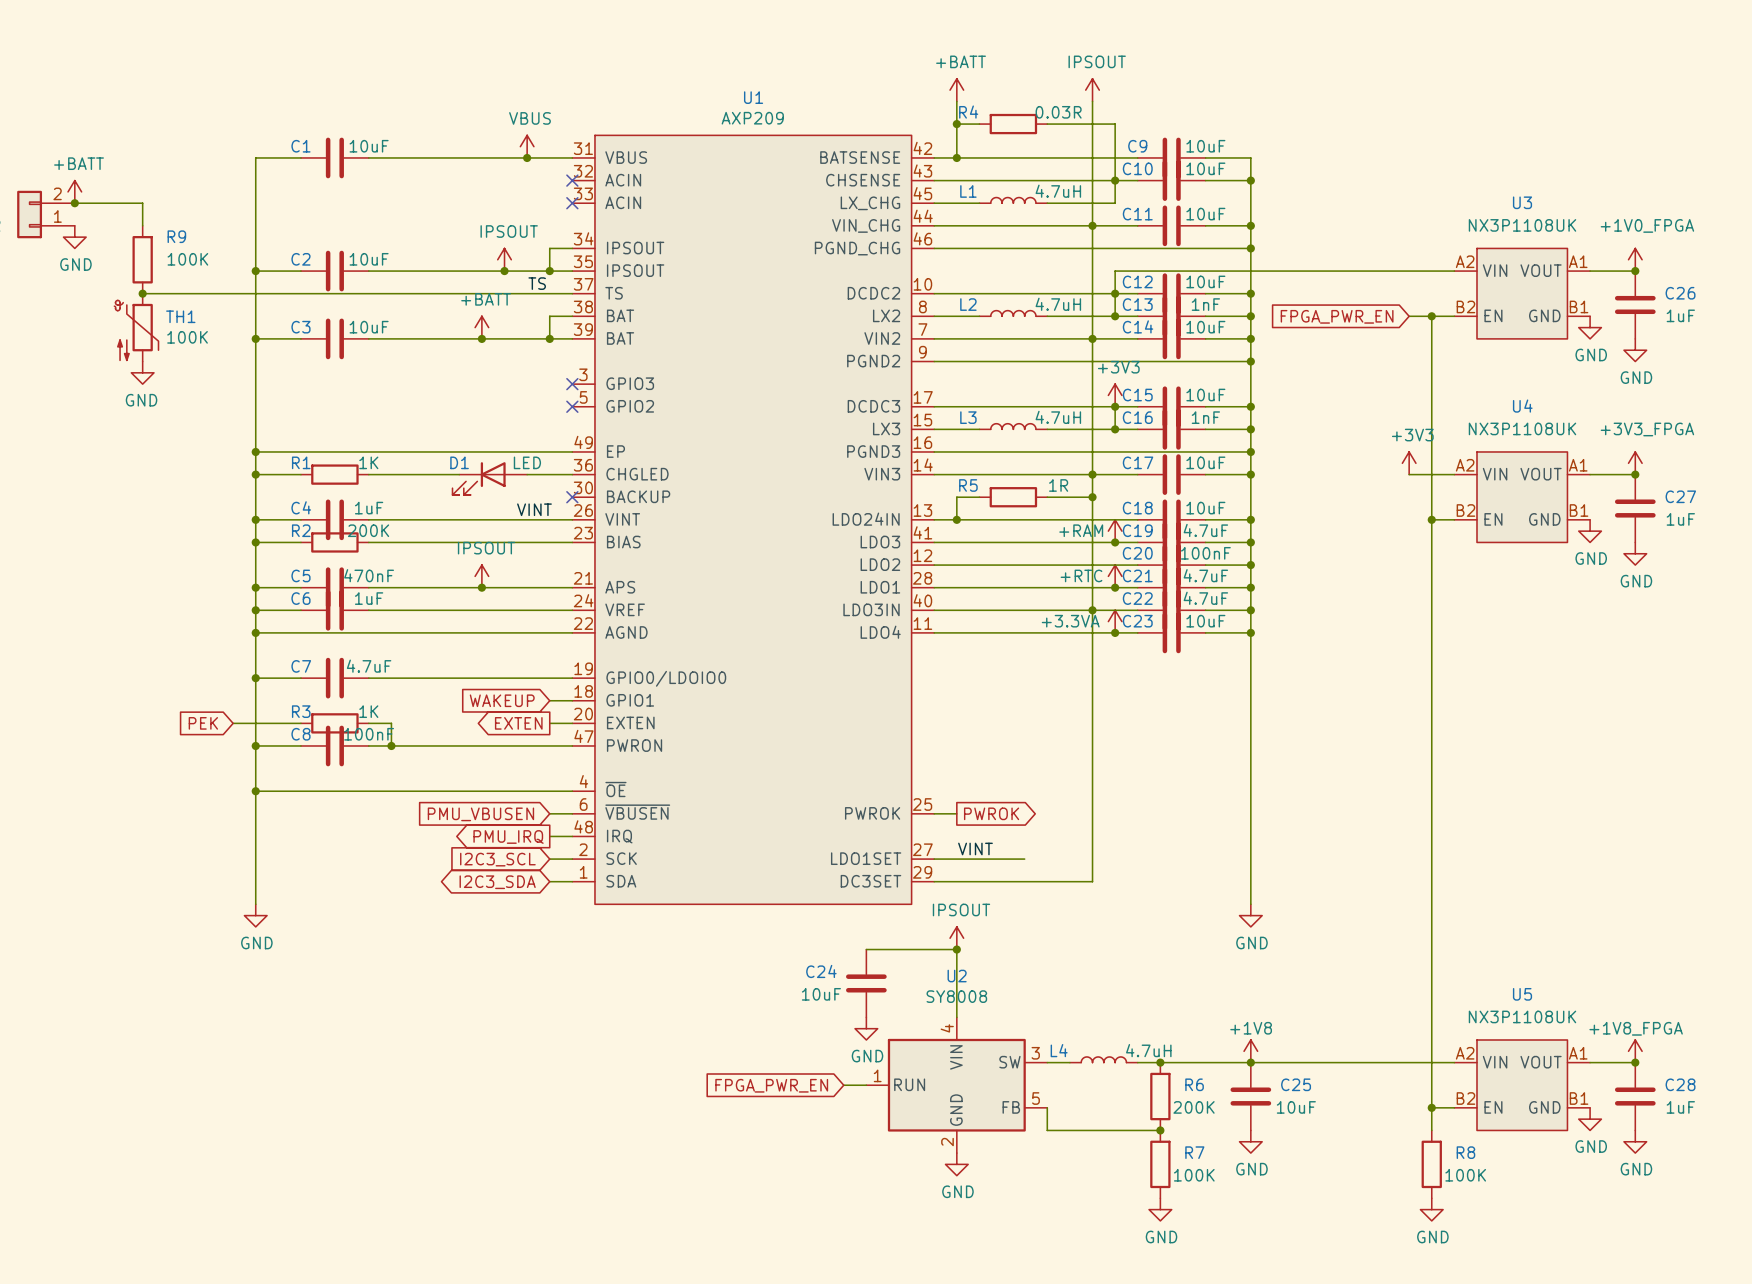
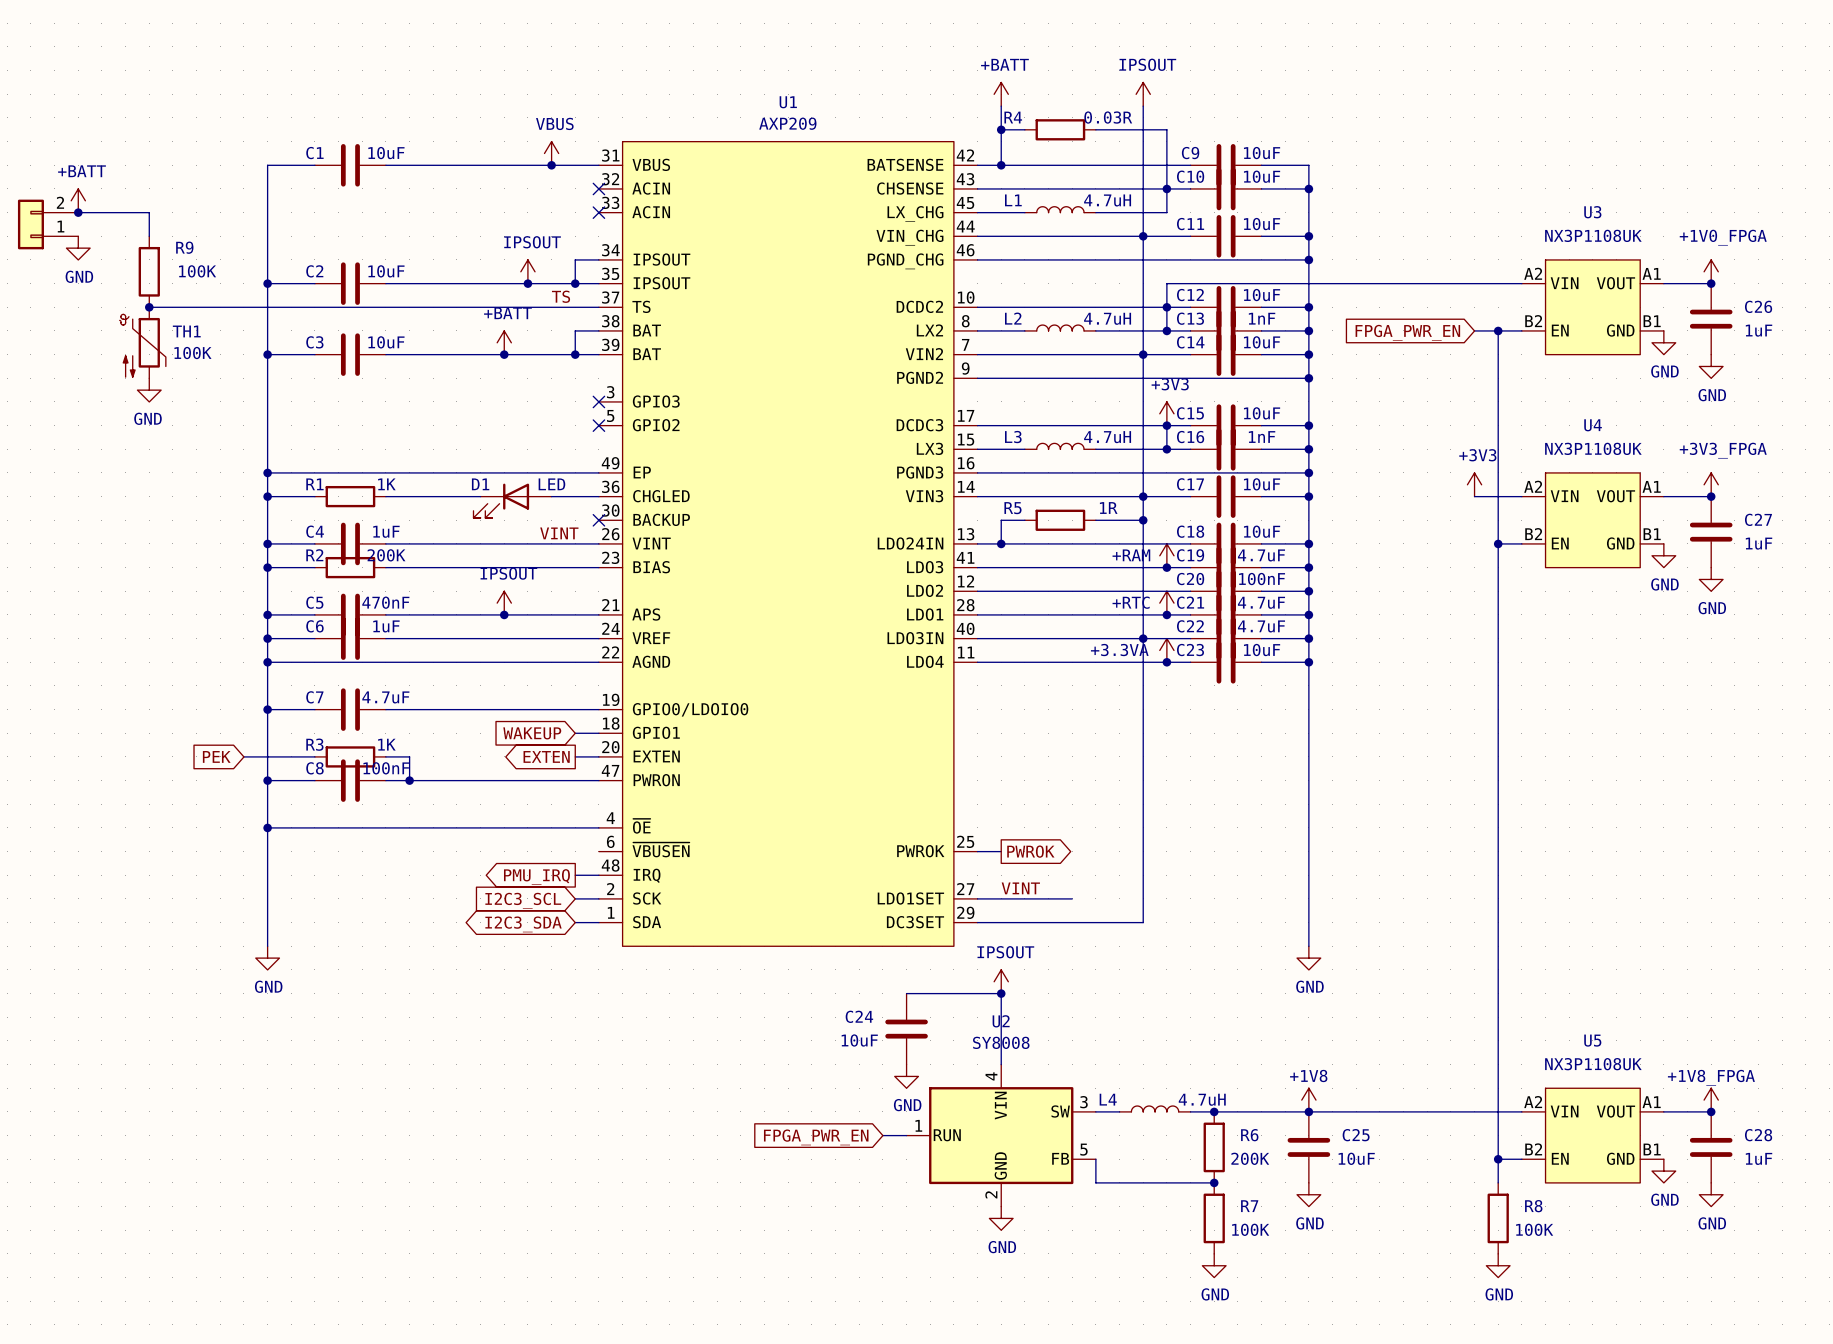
wire: (549, 813) (572, 813) -> none
global label: PMU_VBUSEN (480, 814) -> none

